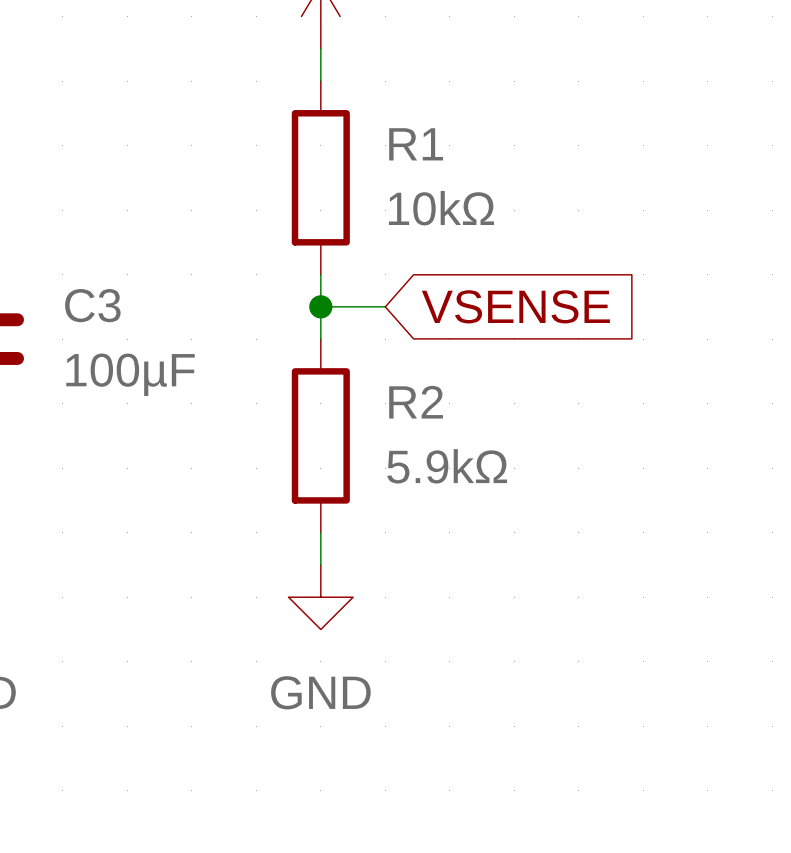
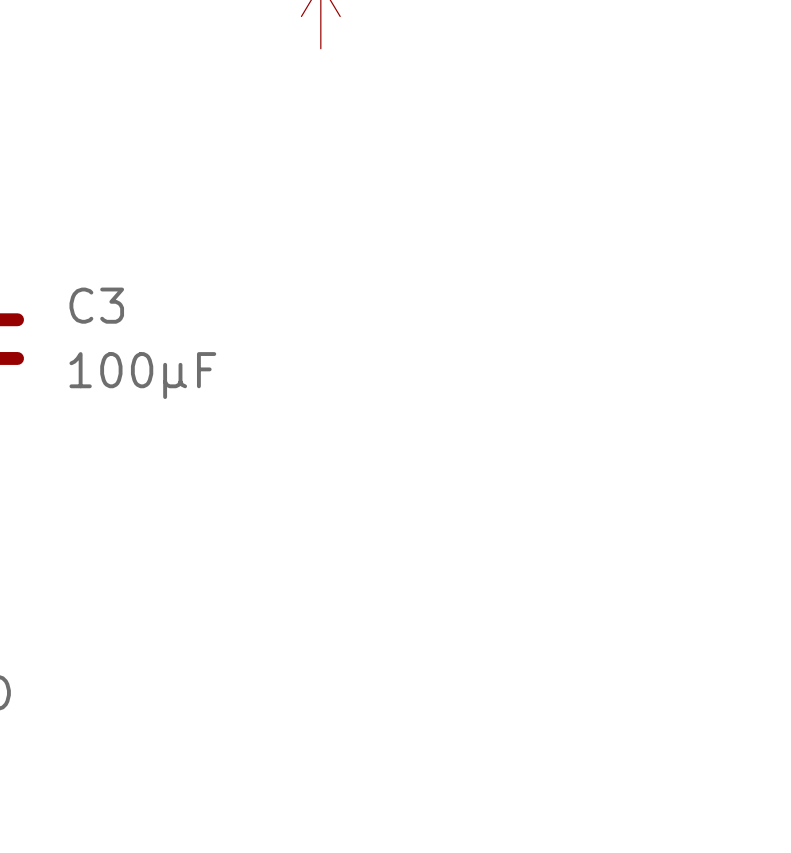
wire: (320, 48) (320, 81) -> none
R1: 10kΩ (320, 177) -> none
wire: (320, 274) (320, 339) -> none
wire: (320, 306) (385, 306) -> none
junction: (320, 306) -> none
global label: VSENSE (515, 306) -> none
R2: 5.9kΩ (320, 435) -> none
wire: (320, 532) (320, 564) -> none
power symbol: GND (320, 597) -> none

